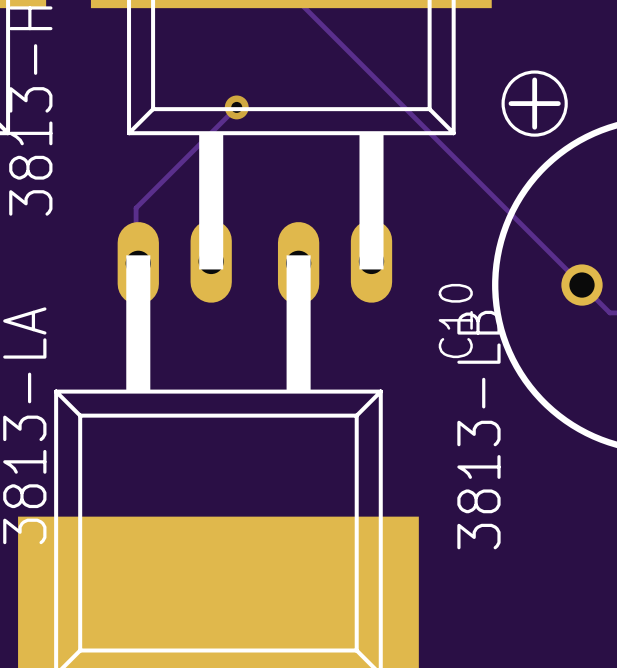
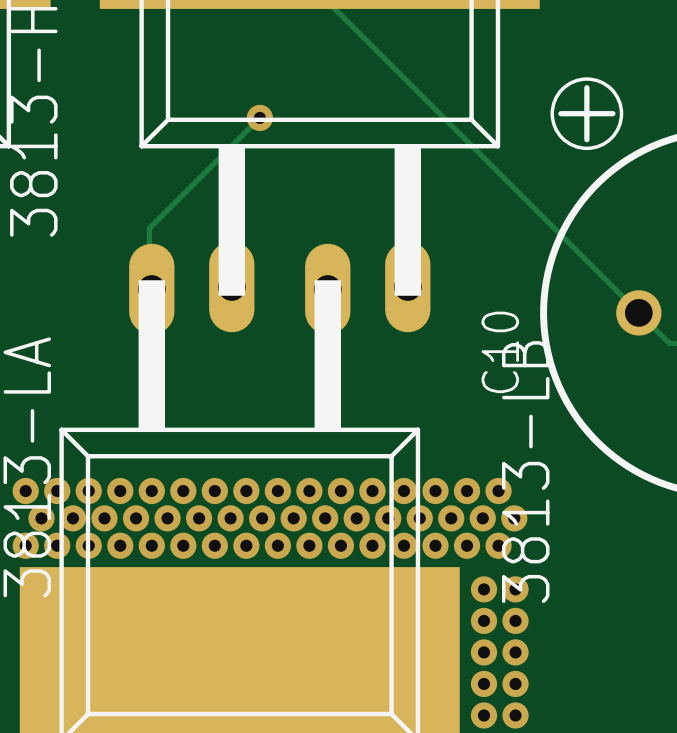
via: none -> (25, 491)
via: none -> (57, 491)
via: none -> (88, 491)
via: none -> (120, 491)
via: none -> (151, 491)
via: none -> (183, 491)
via: none -> (214, 491)
via: none -> (246, 491)
via: none -> (277, 491)
via: none -> (309, 491)
via: none -> (340, 491)
via: none -> (372, 491)
via: none -> (403, 491)
via: none -> (435, 491)
via: none -> (467, 491)
via: none -> (498, 491)
via: none -> (41, 518)
via: none -> (72, 518)
via: none -> (104, 518)
via: none -> (136, 518)
via: none -> (167, 518)
via: none -> (199, 518)
via: none -> (230, 518)
via: none -> (262, 518)
via: none -> (293, 518)
via: none -> (325, 518)
via: none -> (356, 518)
via: none -> (388, 518)
via: none -> (419, 518)
via: none -> (451, 518)
via: none -> (482, 518)
via: none -> (514, 518)
via: none -> (25, 545)
via: none -> (57, 545)
via: none -> (88, 545)
via: none -> (120, 545)
via: none -> (151, 545)
via: none -> (183, 545)
via: none -> (214, 545)
via: none -> (246, 545)
via: none -> (277, 545)
via: none -> (309, 545)
via: none -> (340, 545)
via: none -> (372, 545)
via: none -> (403, 545)
via: none -> (435, 545)
via: none -> (467, 545)
via: none -> (498, 545)
via: none -> (484, 589)
via: none -> (515, 589)
via: none -> (484, 620)
via: none -> (515, 620)
via: none -> (484, 652)
via: none -> (515, 652)
via: none -> (484, 683)
via: none -> (515, 683)
via: none -> (484, 715)
via: none -> (515, 715)

